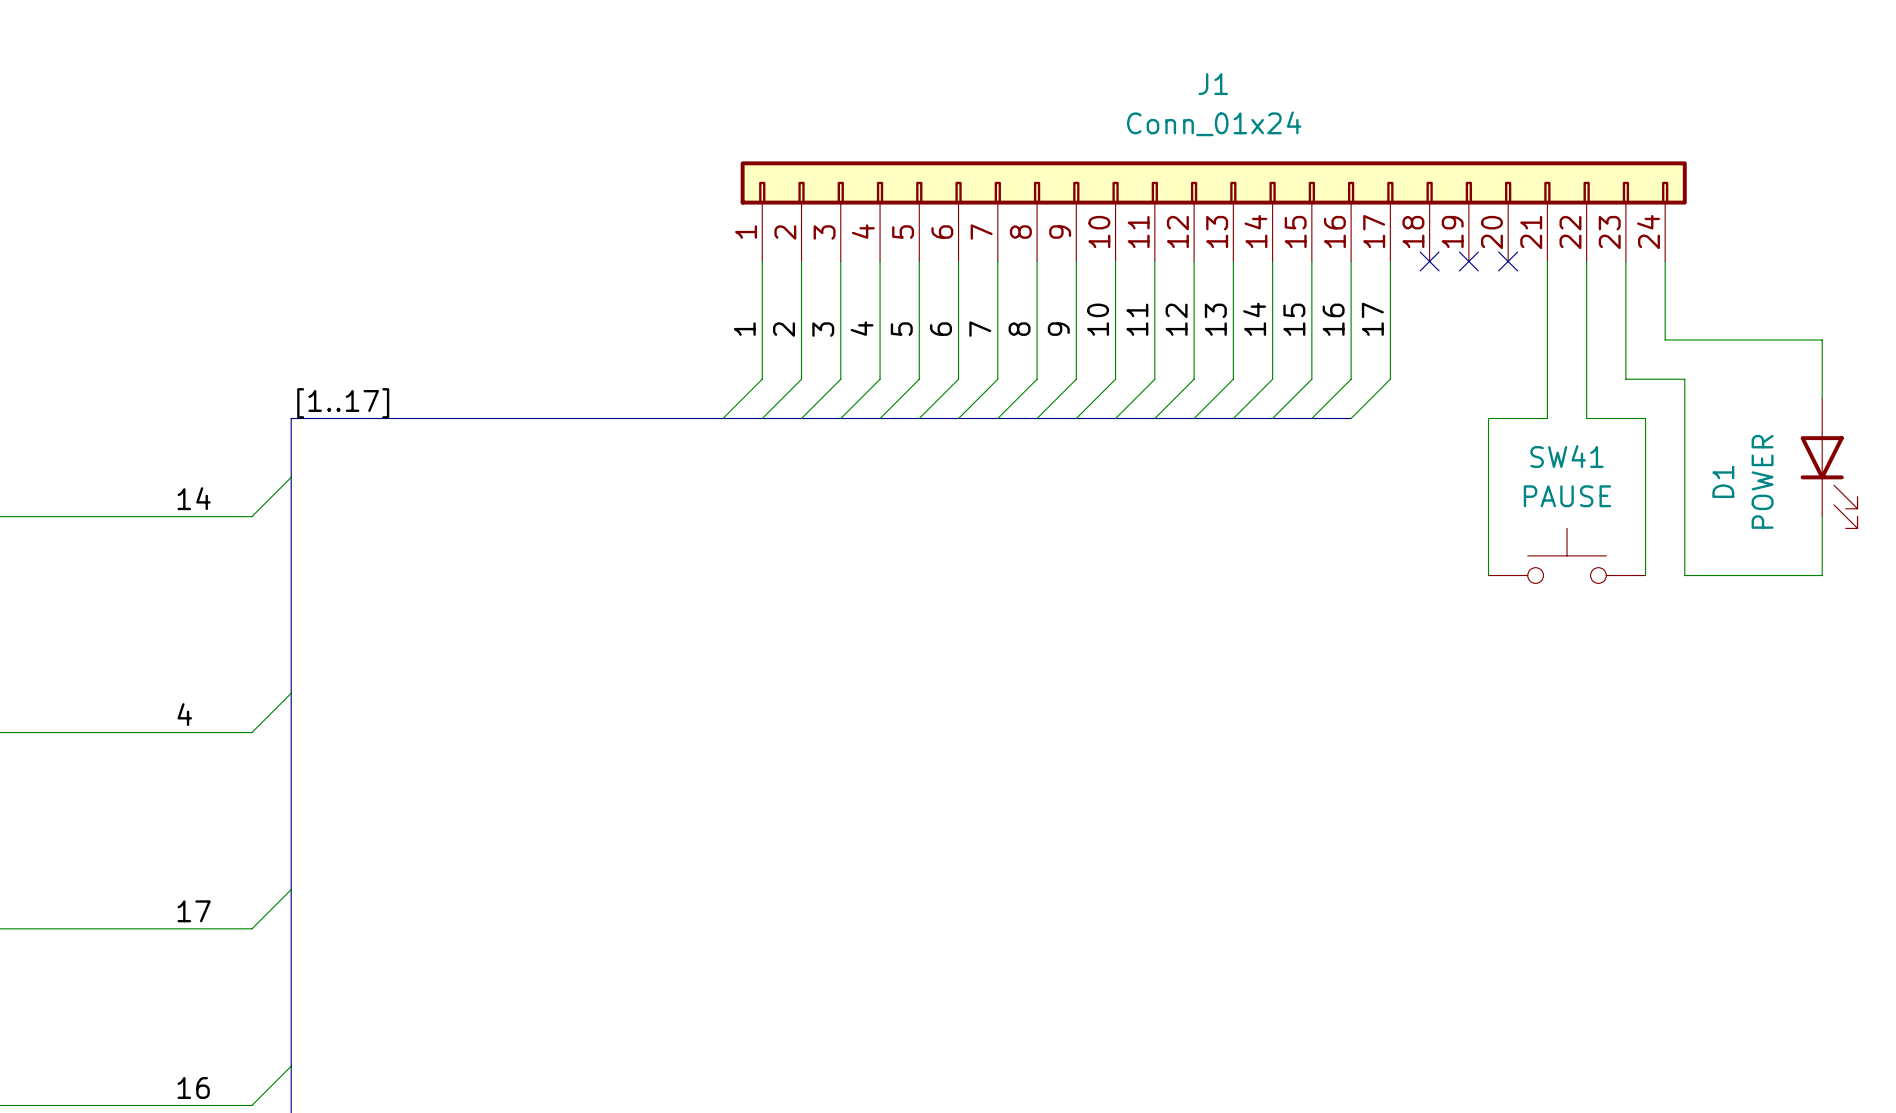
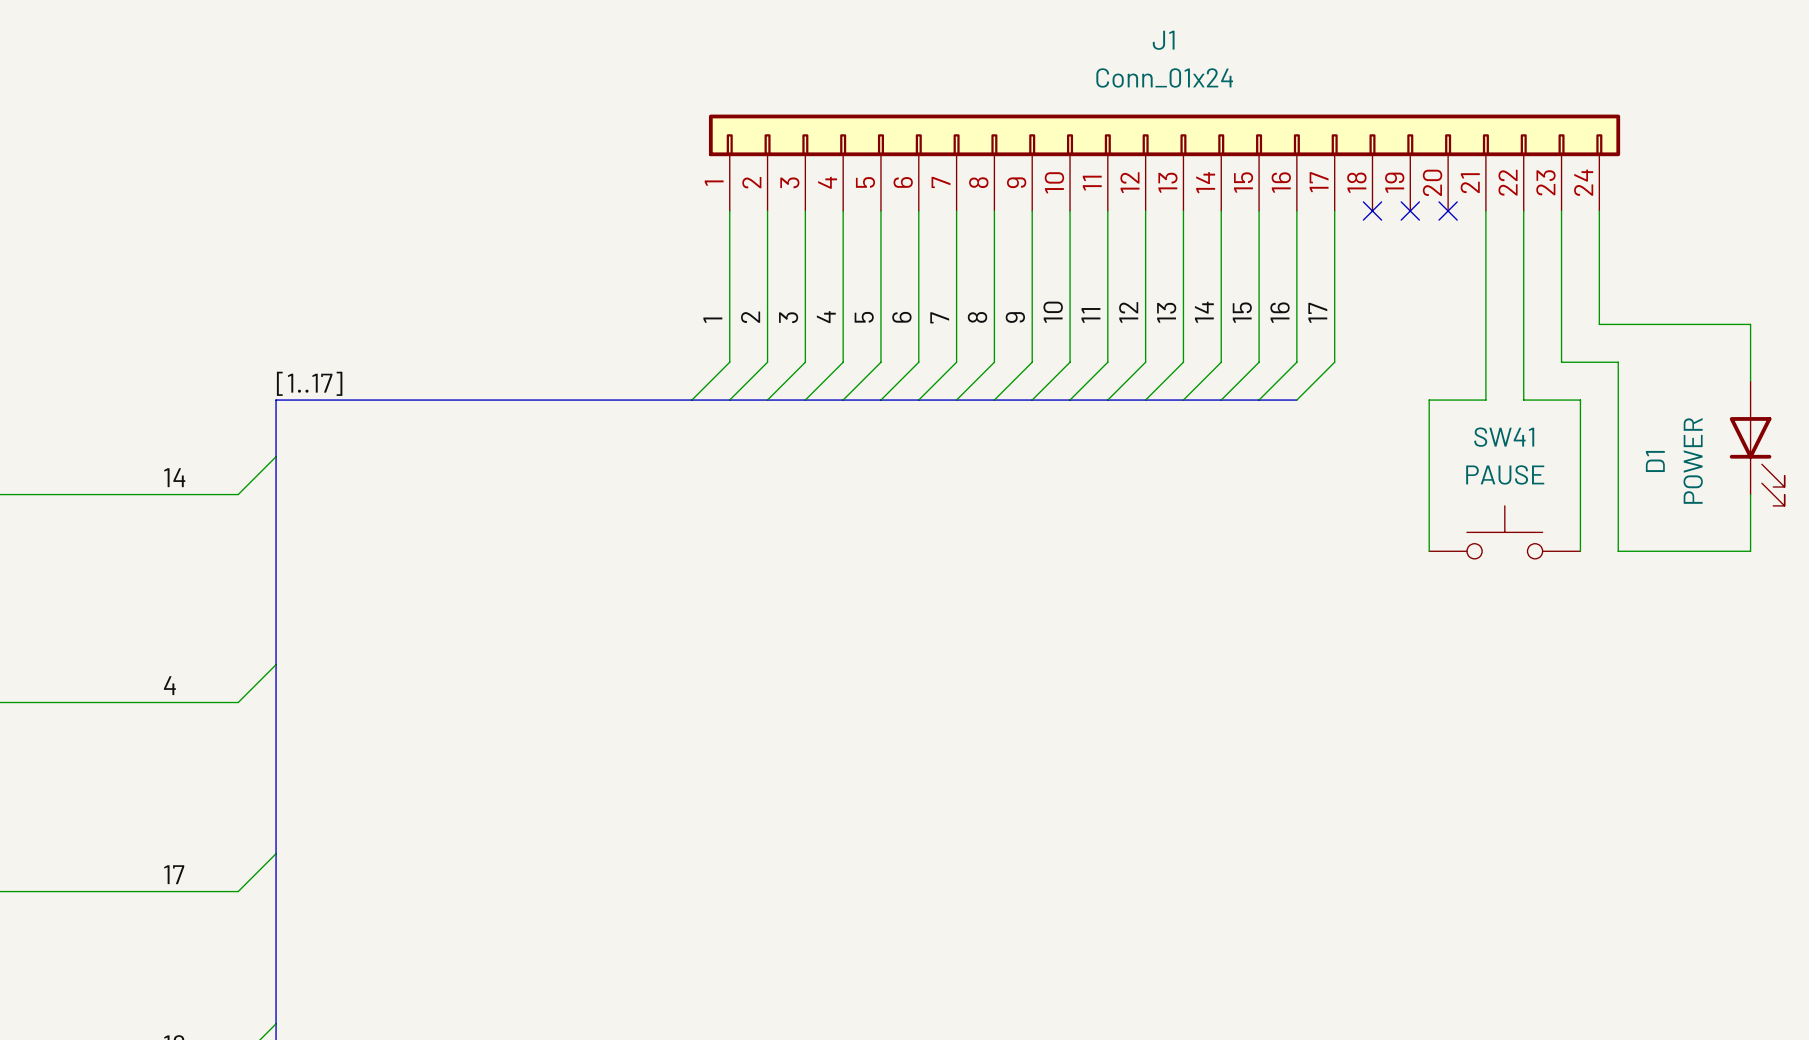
J1 position: (1213, 211) -> (1164, 162)
no-connect mark: none -> (1372, 211)
no-connect mark: none -> (1410, 211)
no-connect mark: none -> (1448, 211)
no-connect mark: (1429, 261) -> none
no-connect mark: (1468, 261) -> none
no-connect mark: (1508, 261) -> none

